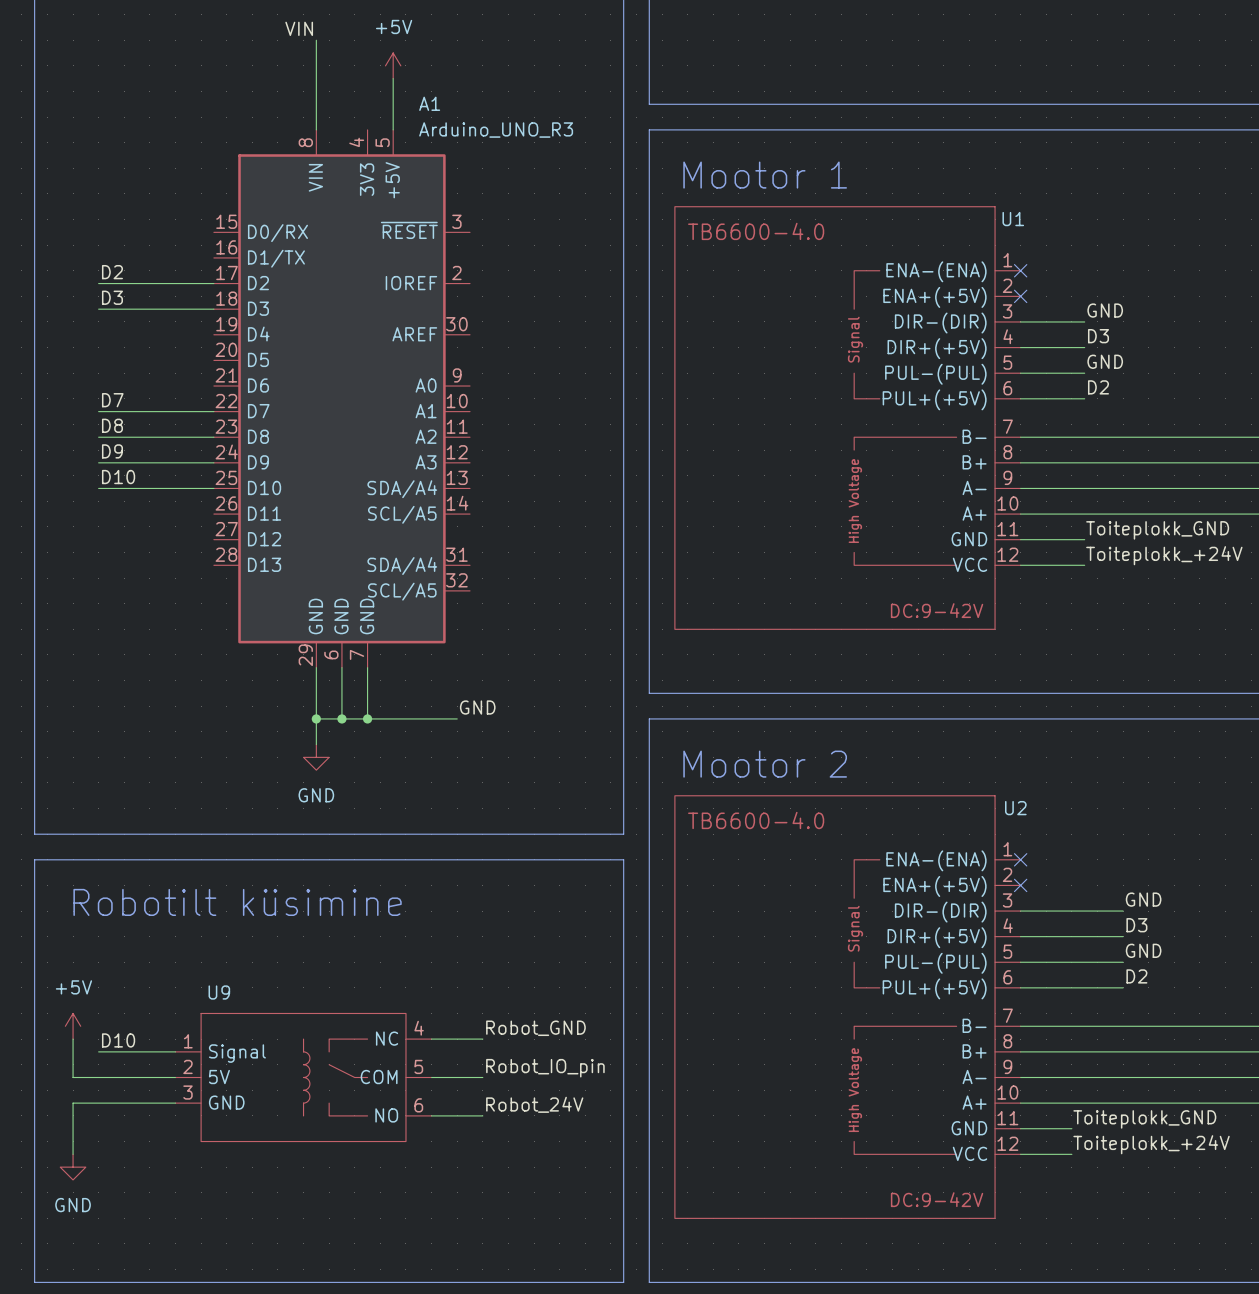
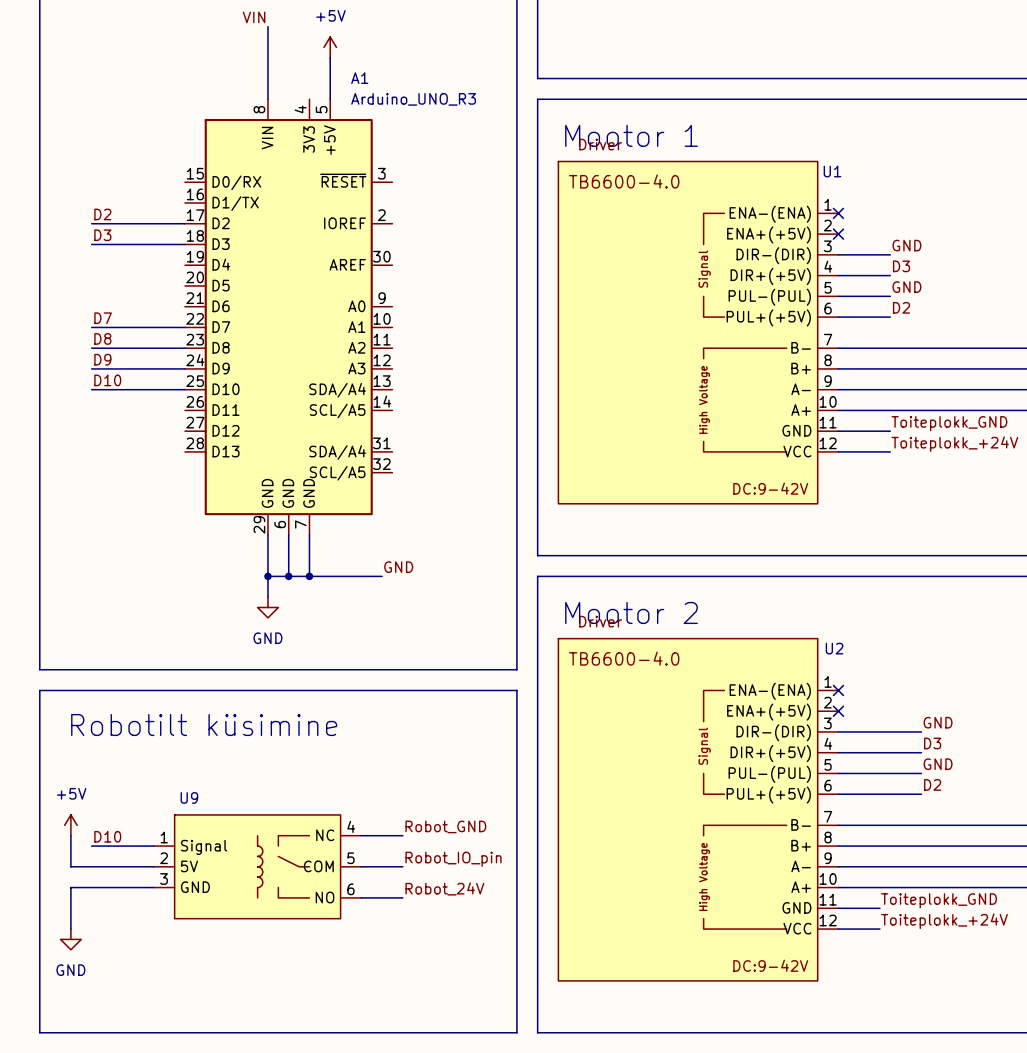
U1 symbol: [674, 206, 1021, 630] -> [558, 161, 839, 504]
U2 symbol: [674, 795, 1021, 1219] -> [558, 638, 839, 981]
U9 symbol: [175, 1013, 432, 1142] -> [153, 814, 362, 919]

